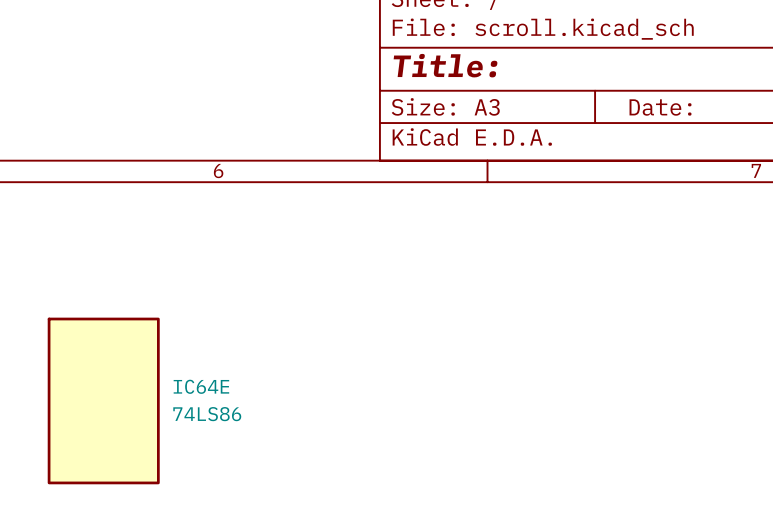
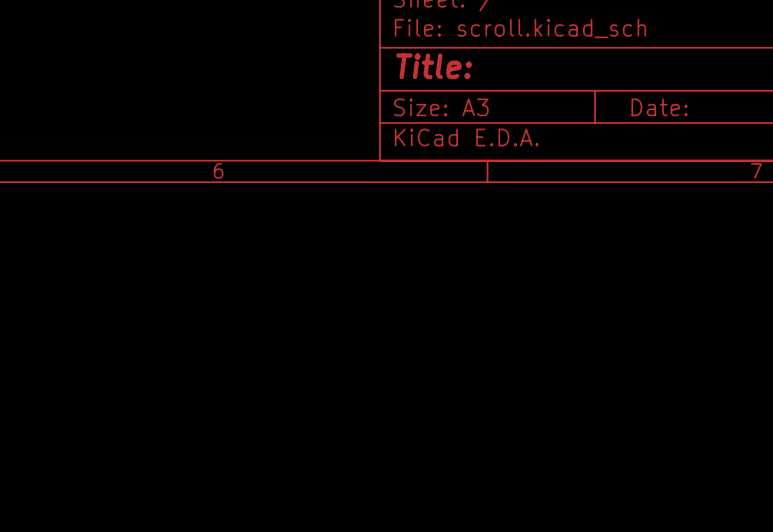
IC64E: 74LS86 (103, 400) -> none

